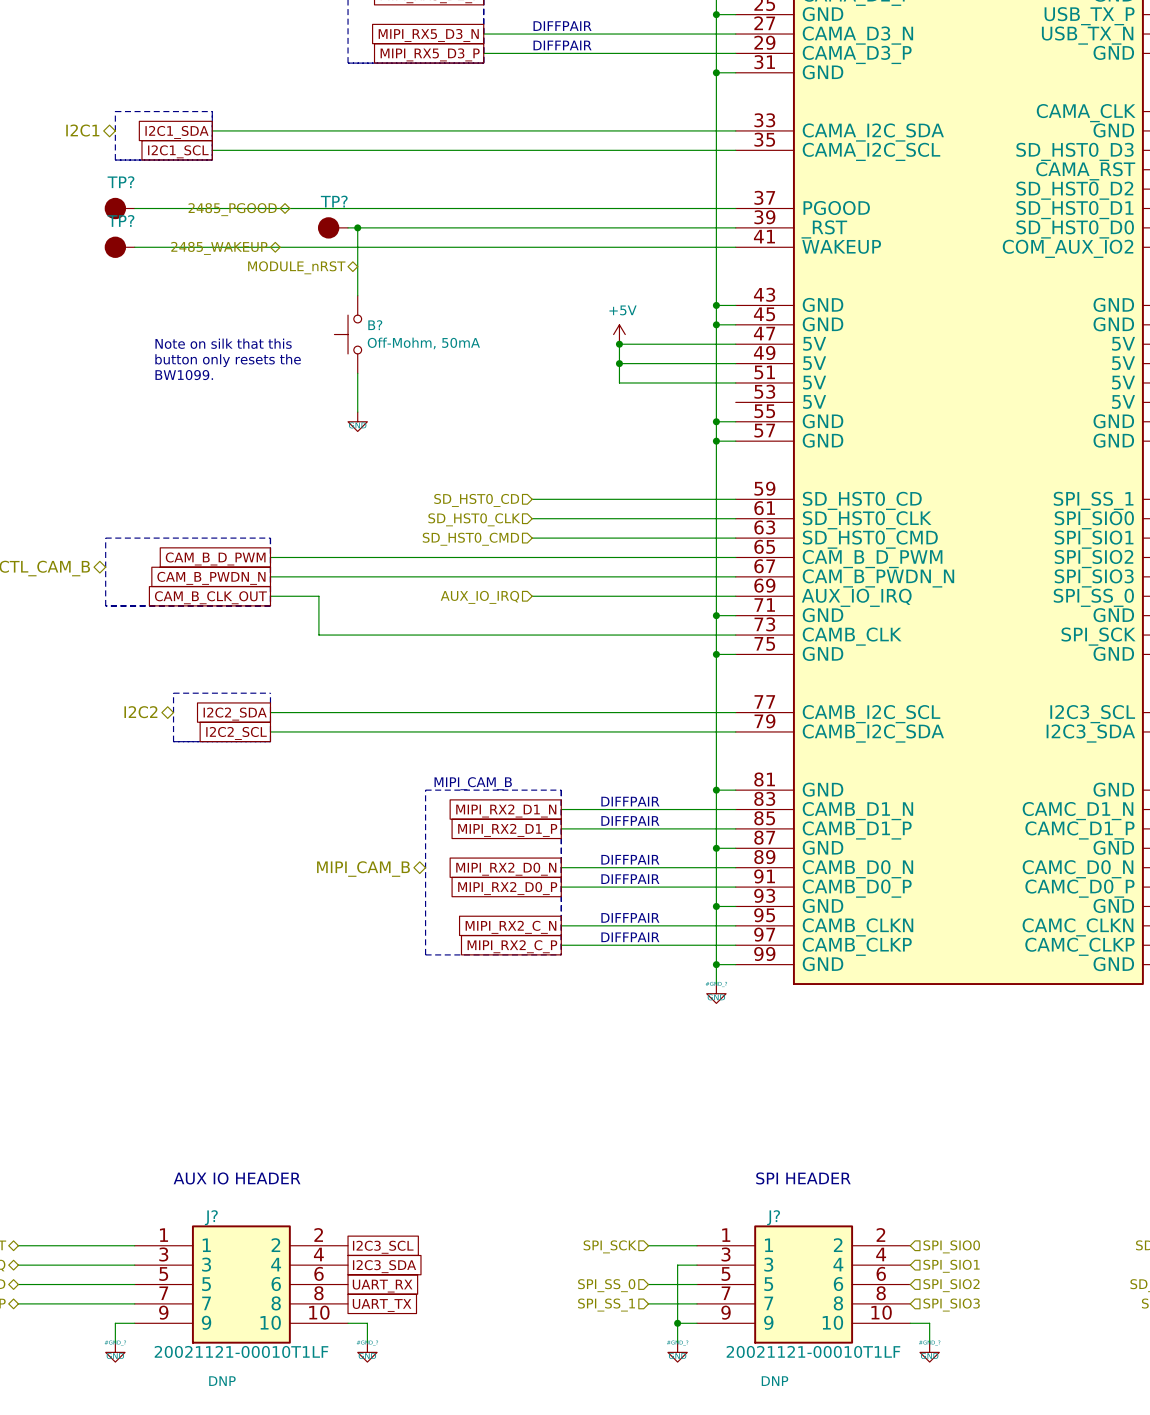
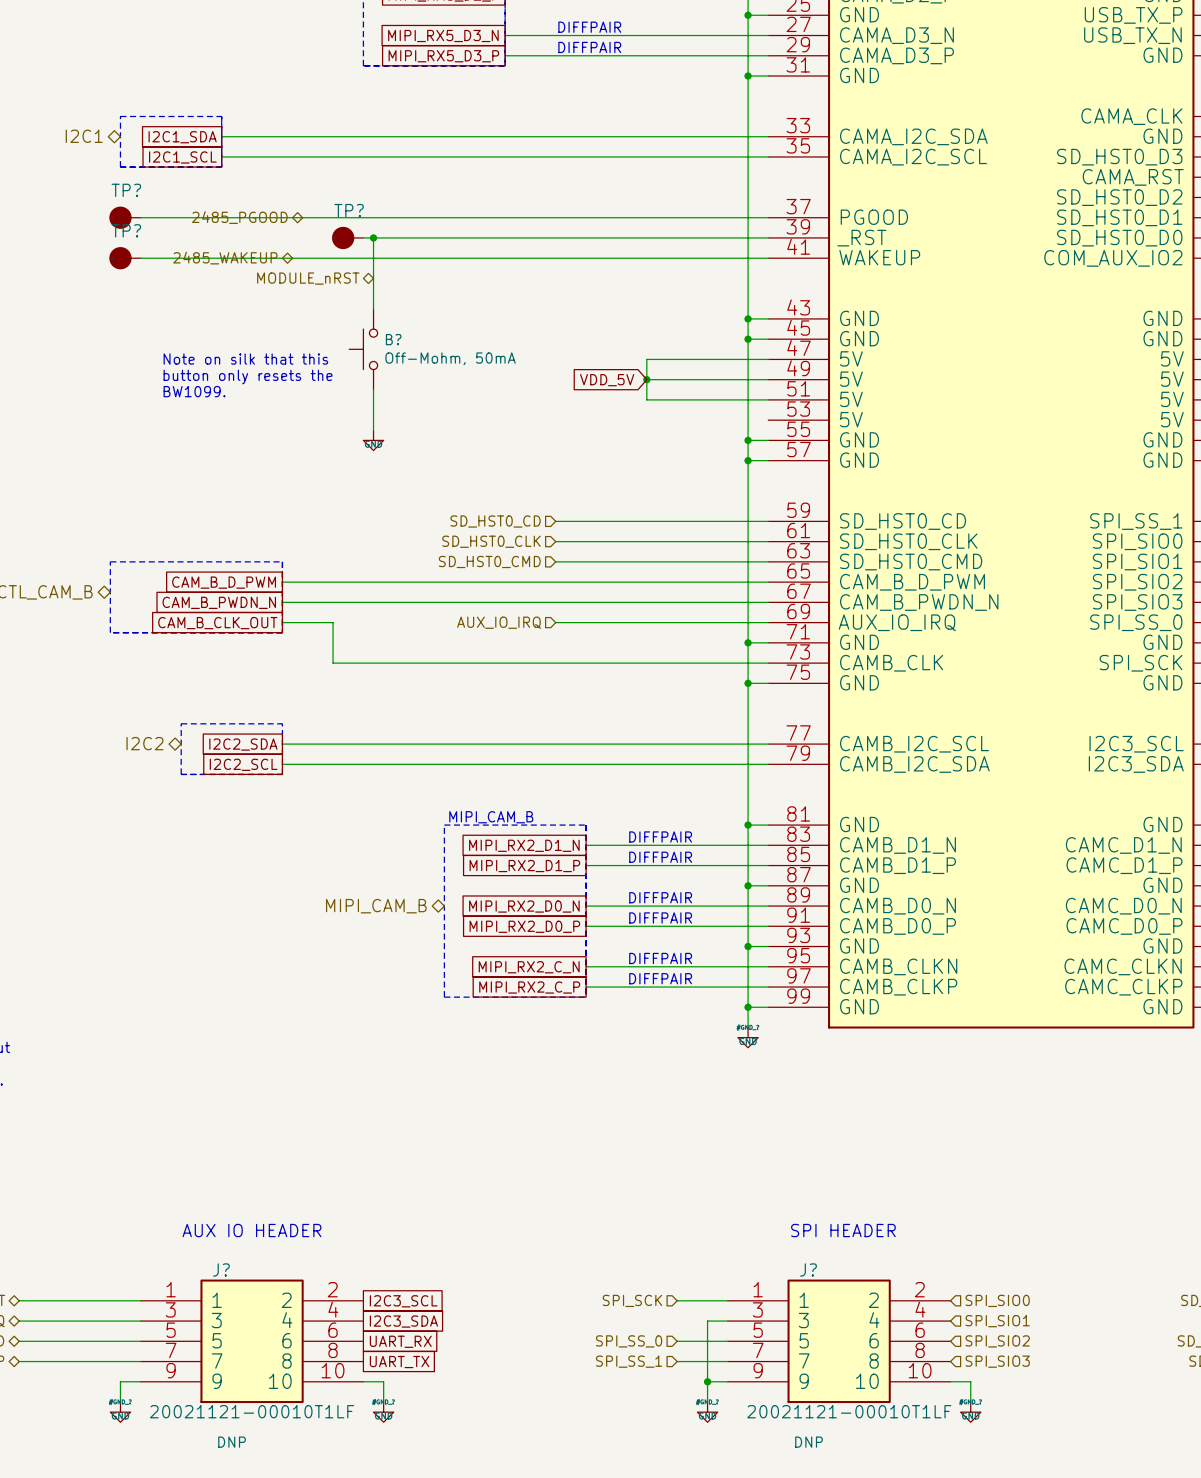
power symbol: +5V (619, 334) -> none
junction: (619, 344) -> none
global label: none -> VDD_5V (607, 380)

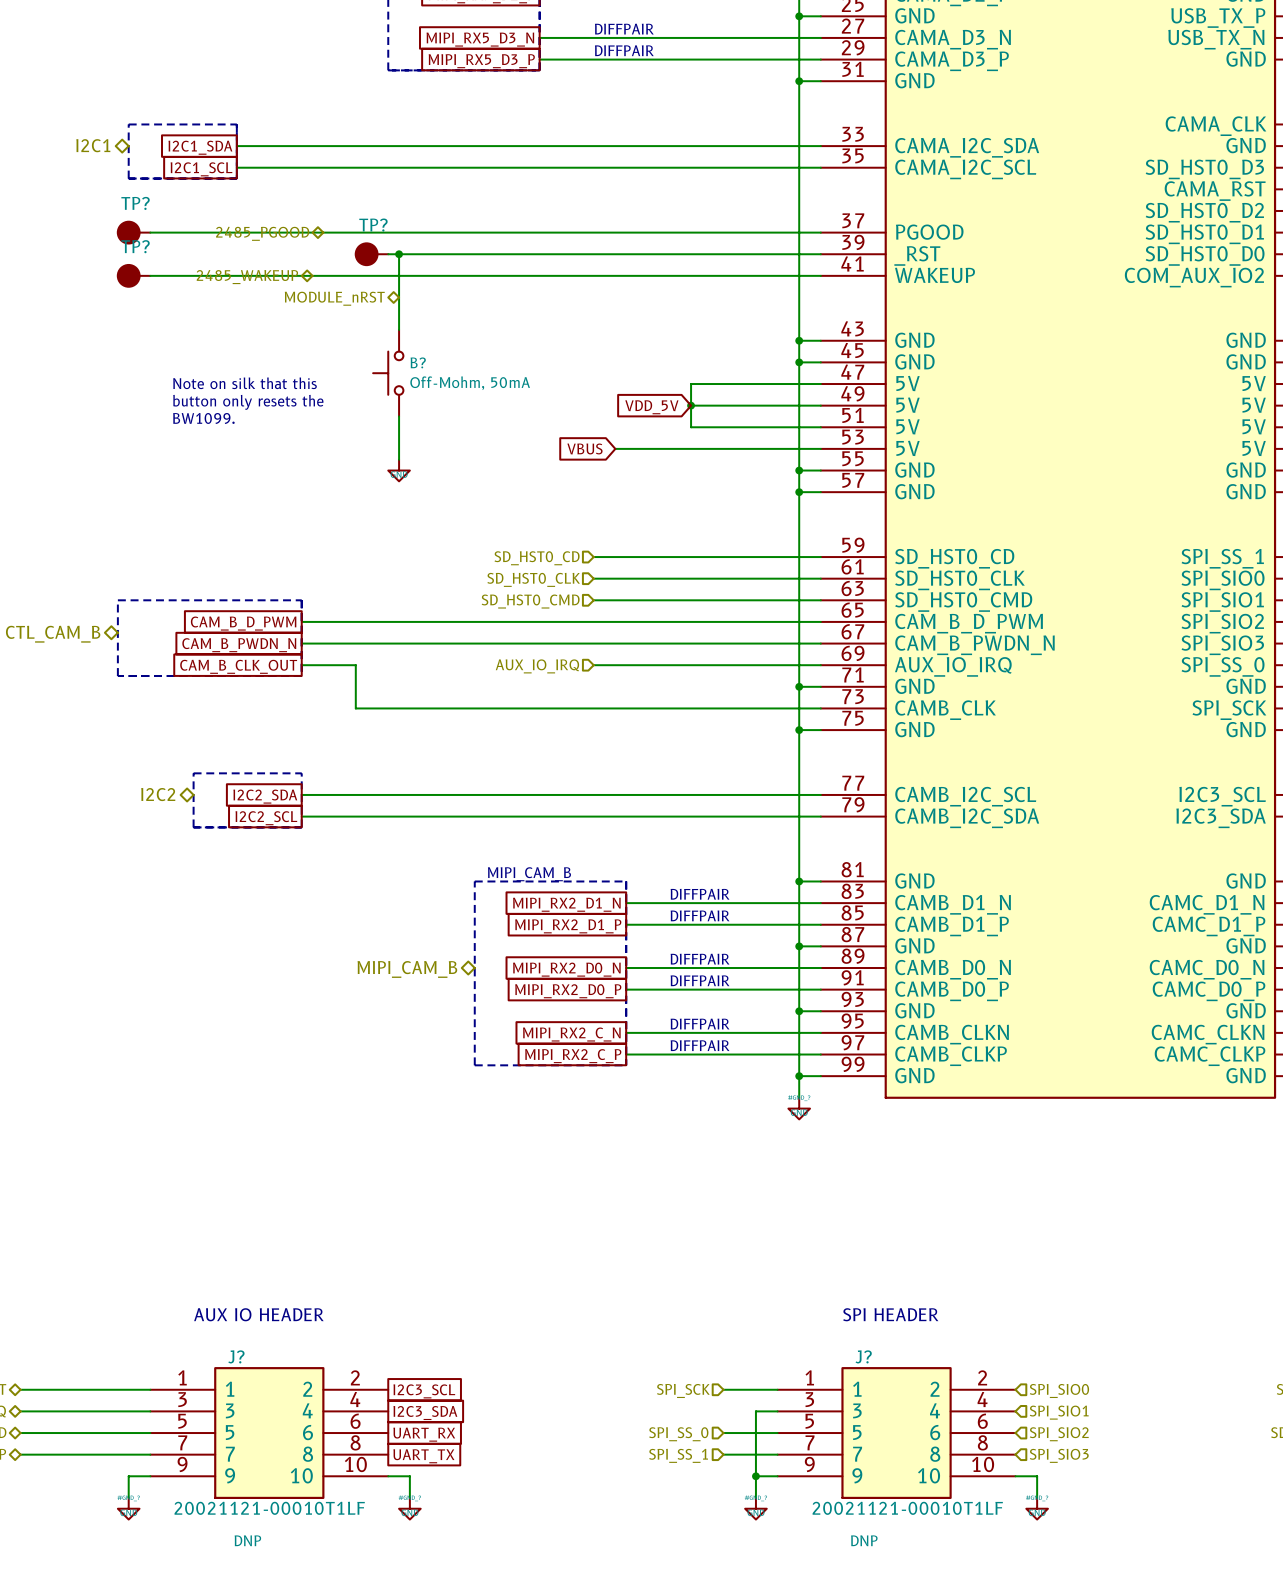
global label: none -> VBUS (584, 448)
wire: none -> (615, 448) (820, 448)

